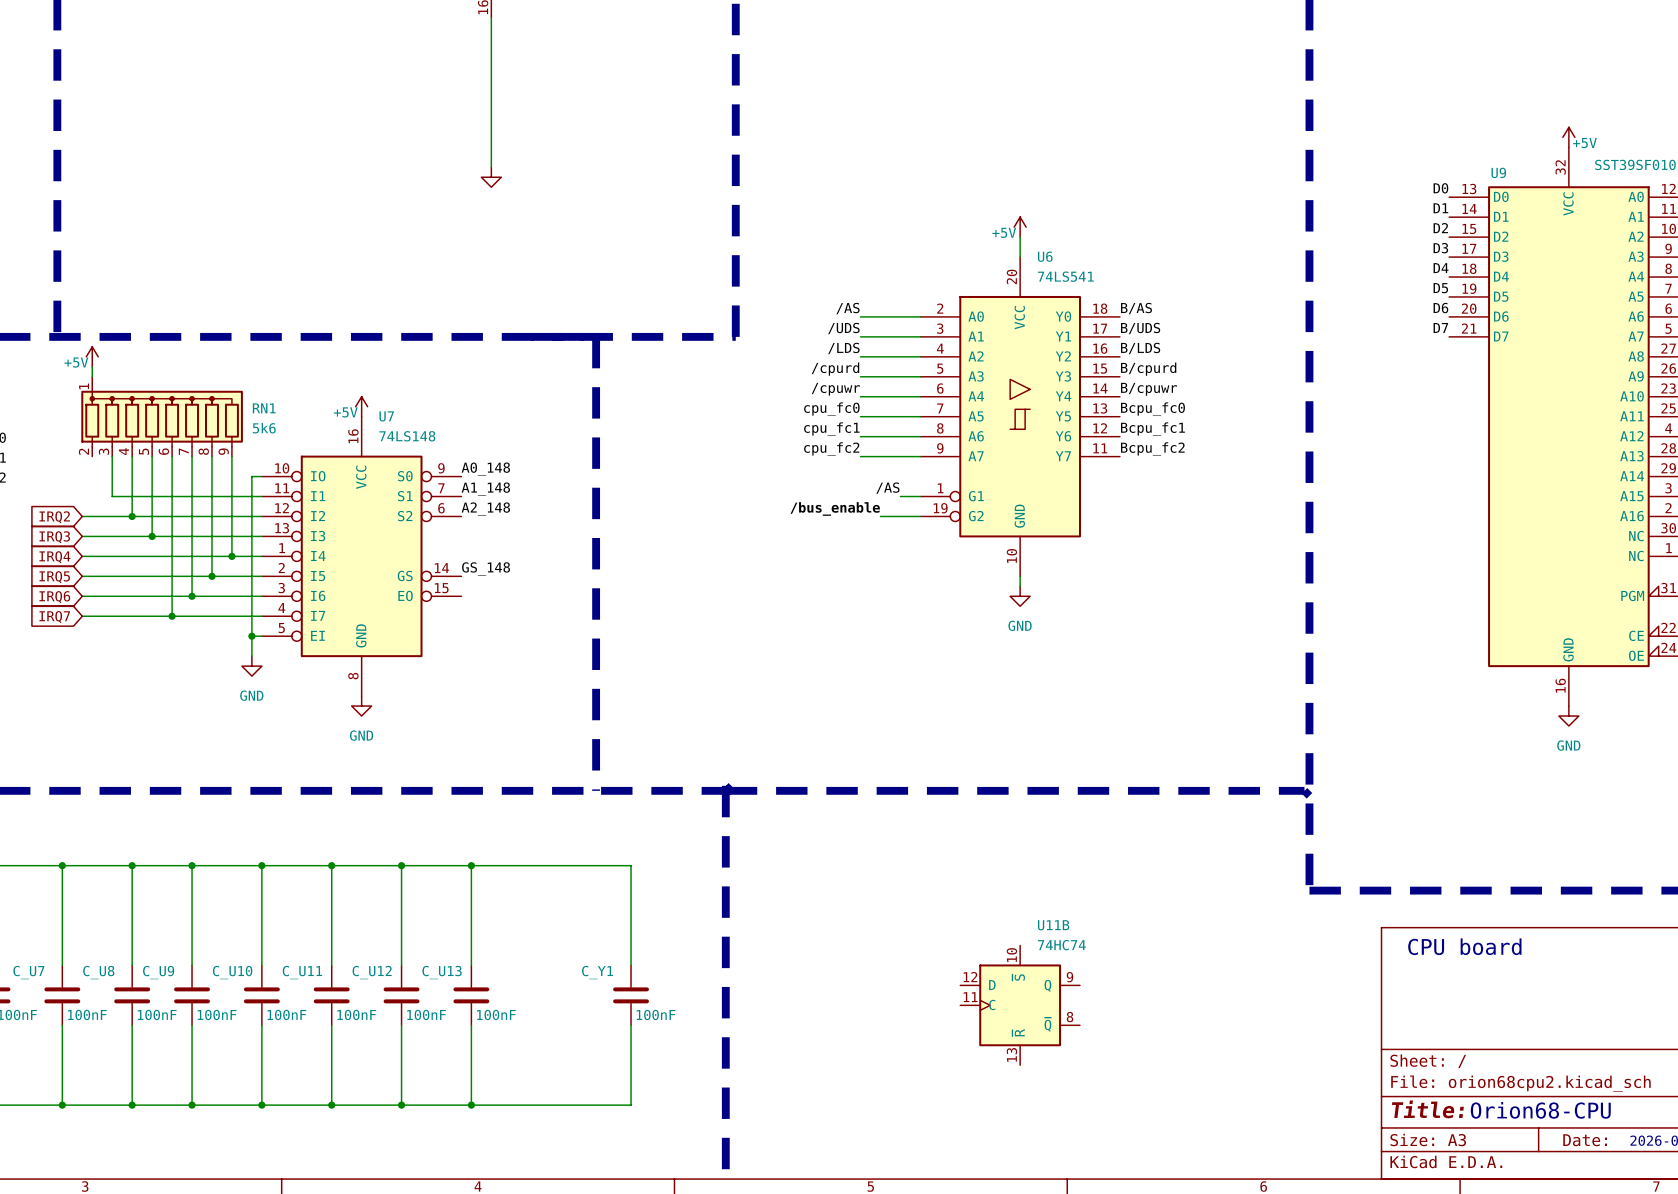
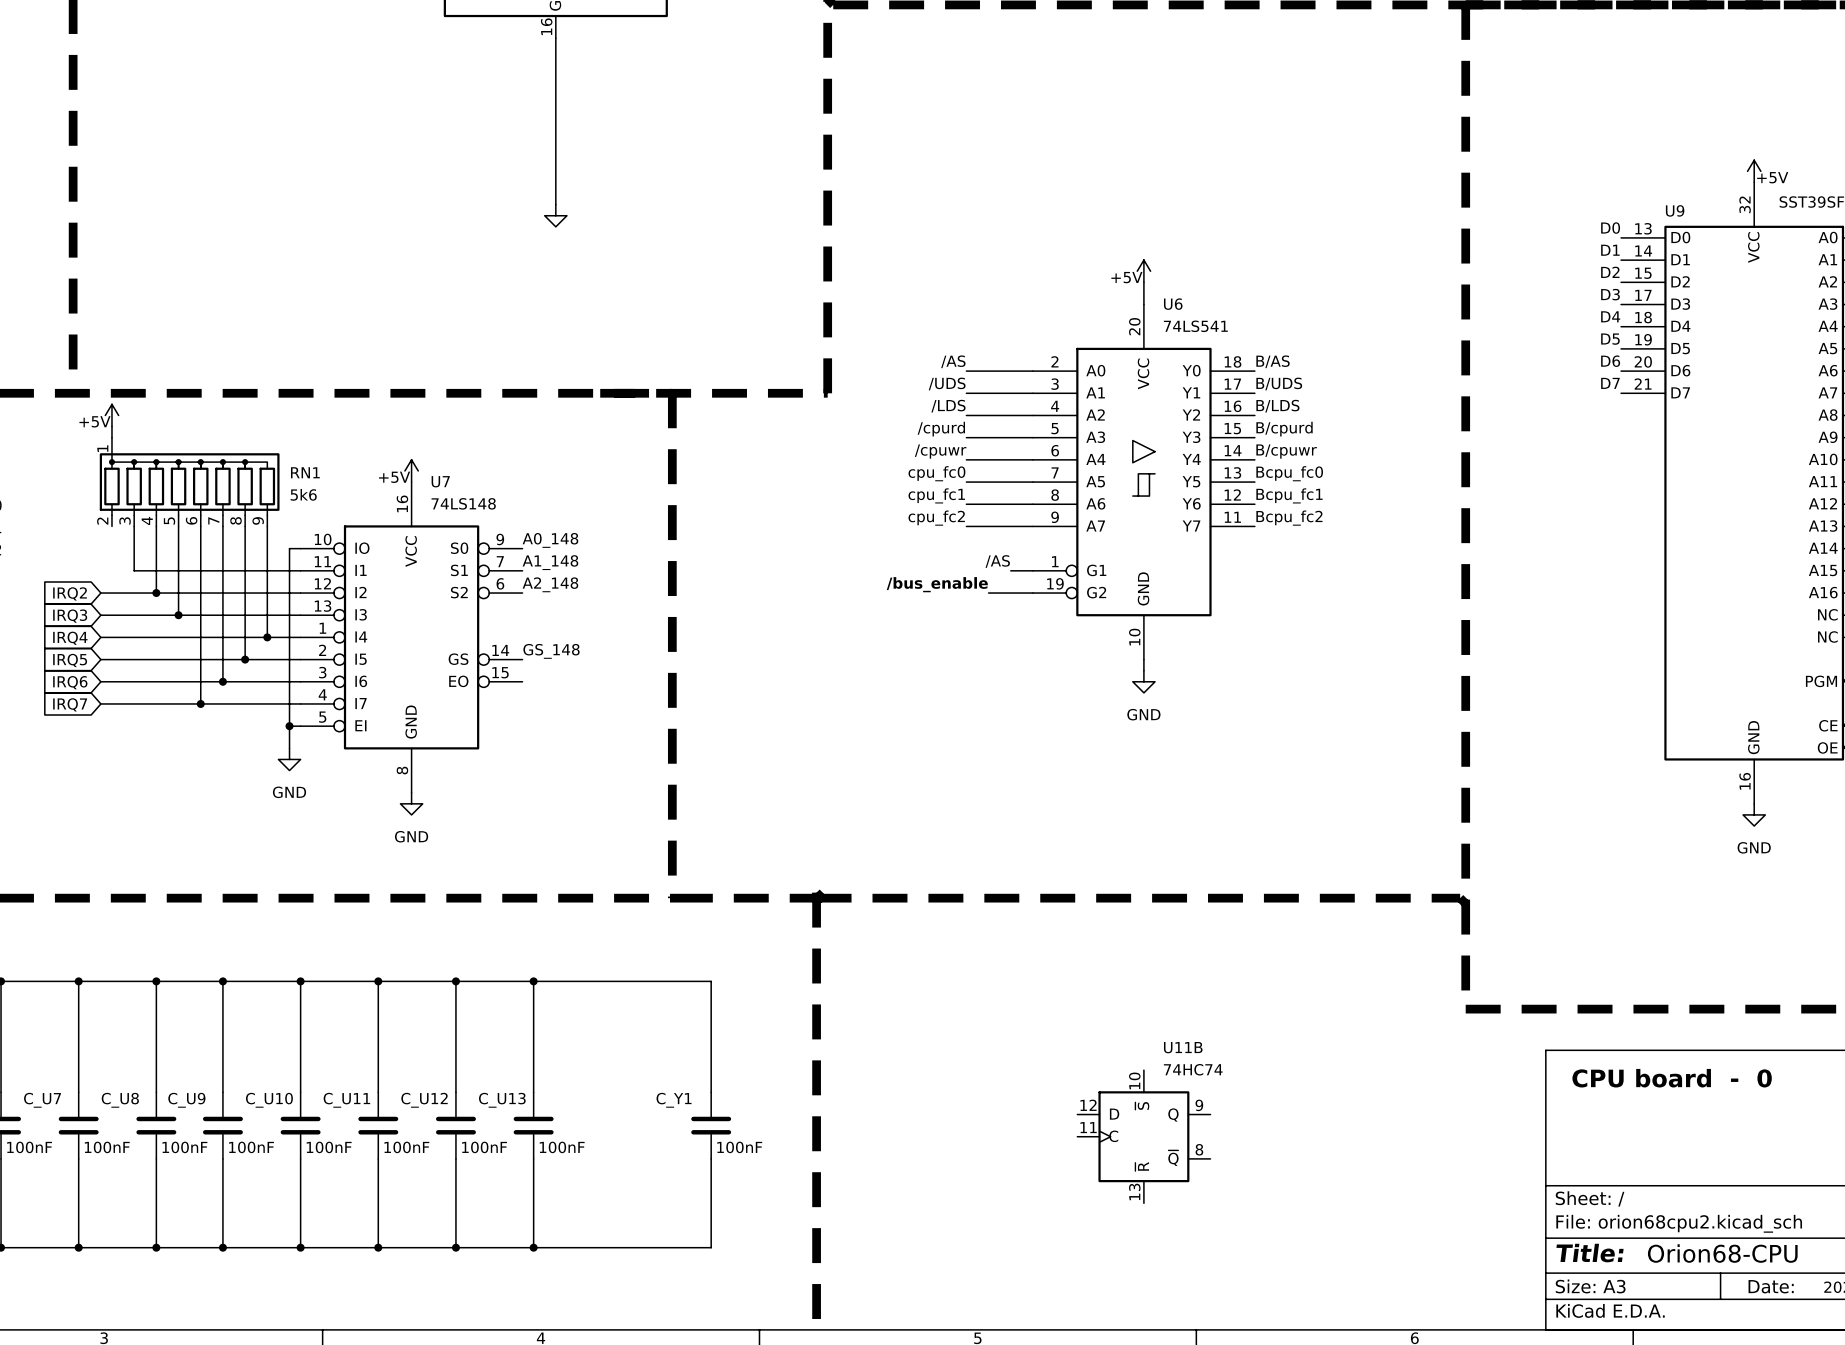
text: CPU board (1464, 946) -> CPU board - 0 (1672, 1078)

